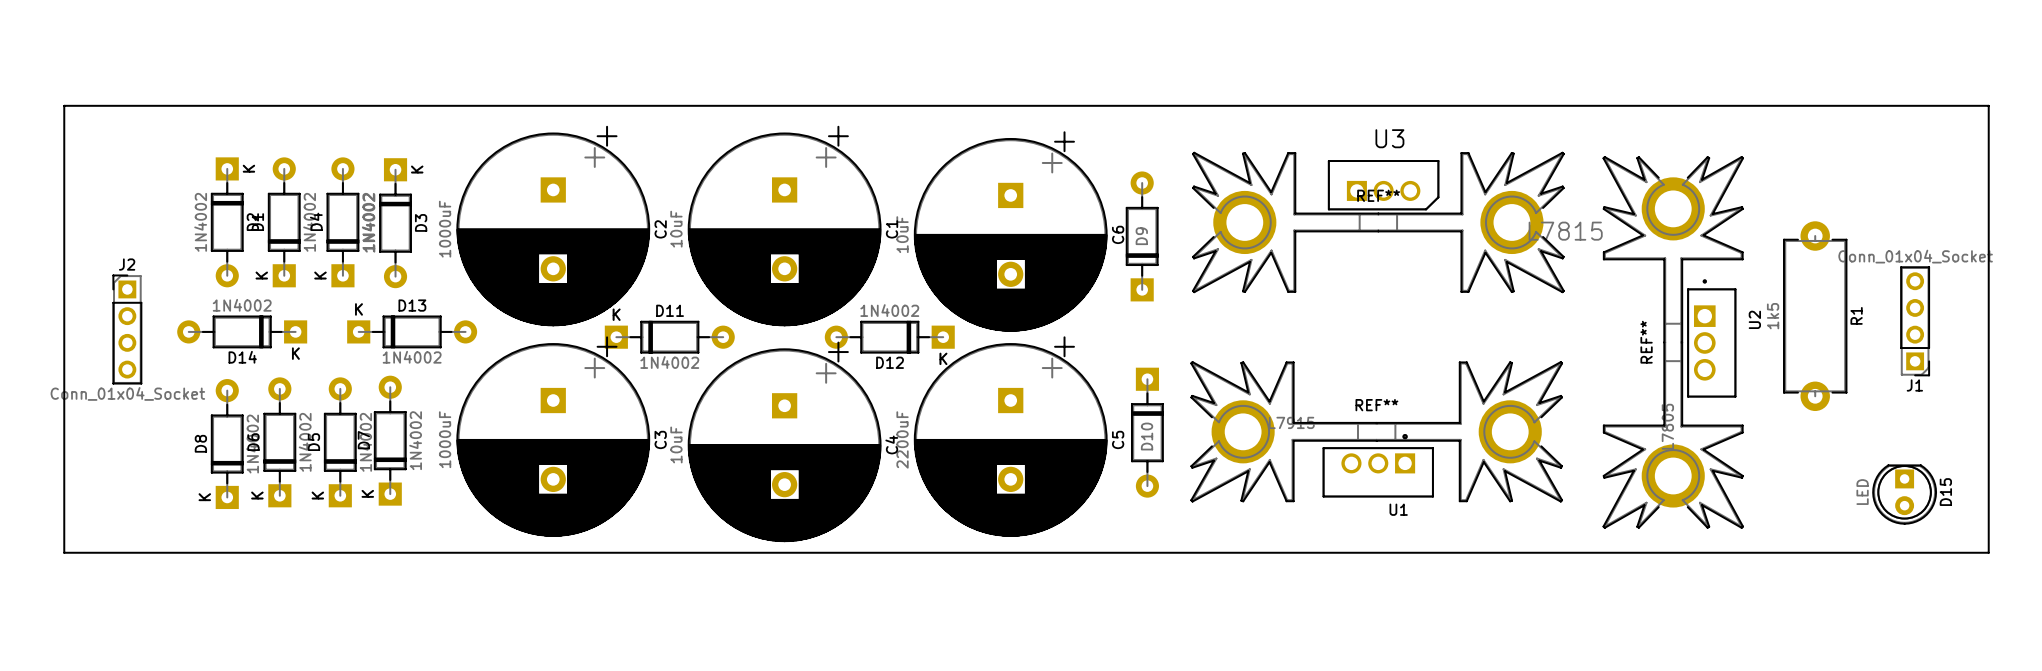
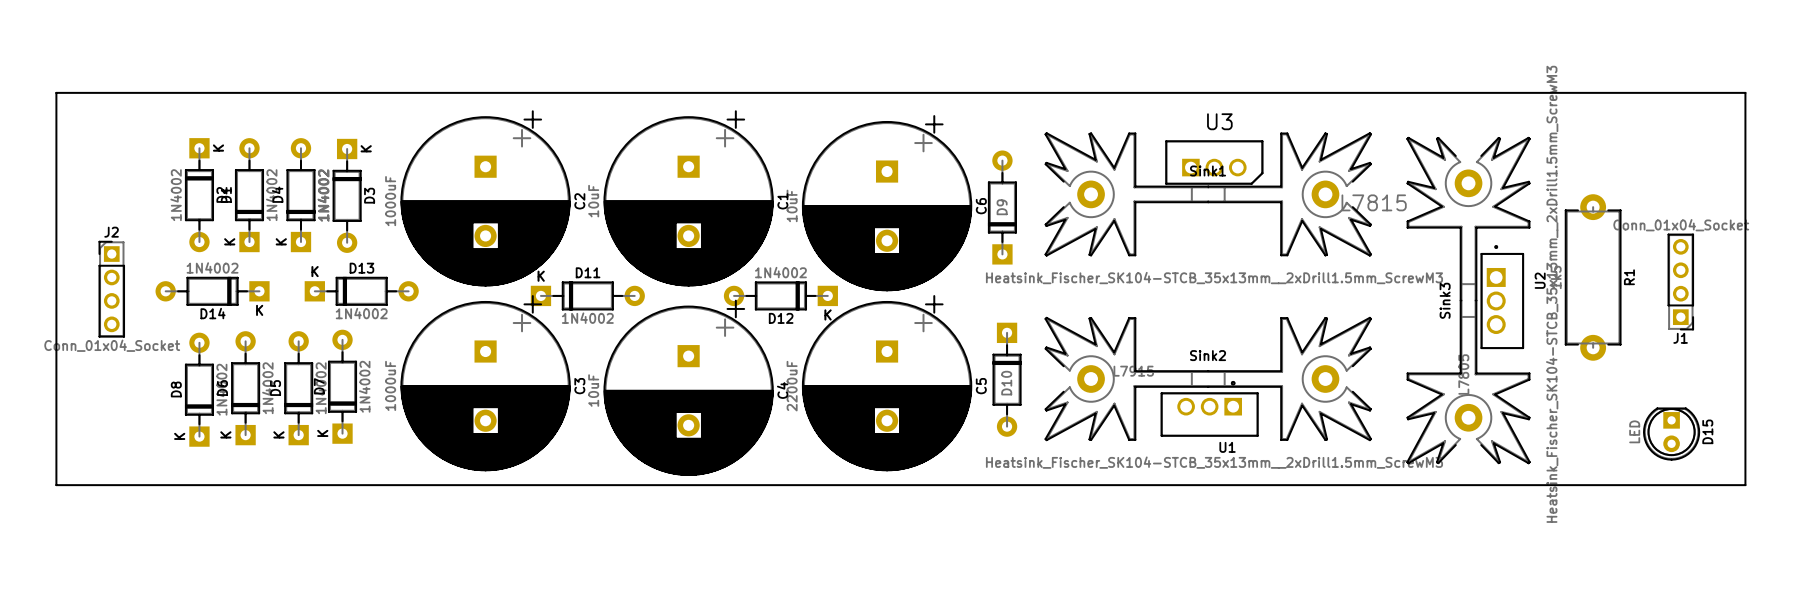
Sink1: none -> Heatsink_Fischer_SK104-STCB_35x13mm__2xDrill1.5mm_ScrewM3 (1208, 194)
REF**: (1378, 222) -> none
REF**: (1673, 342) -> none
Sink3: none -> Heatsink_Fischer_SK104-STCB_35x13mm__2xDrill1.5mm_ScrewM3 (1468, 300)
REF**: (1376, 431) -> none
Sink2: none -> Heatsink_Fischer_SK104-STCB_35x13mm__2xDrill1.5mm_ScrewM3 (1208, 379)

